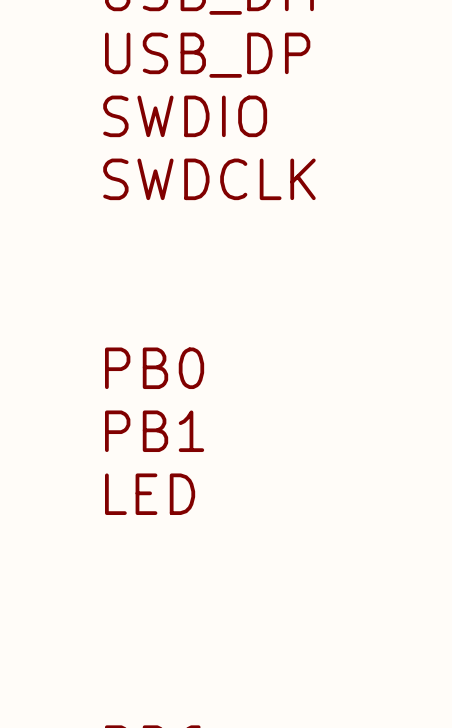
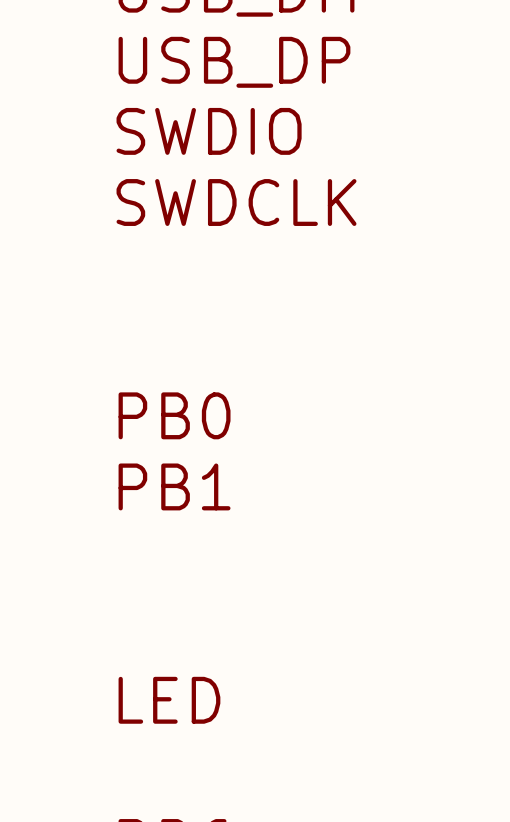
label position: LED (150, 494) -> LED (169, 700)

